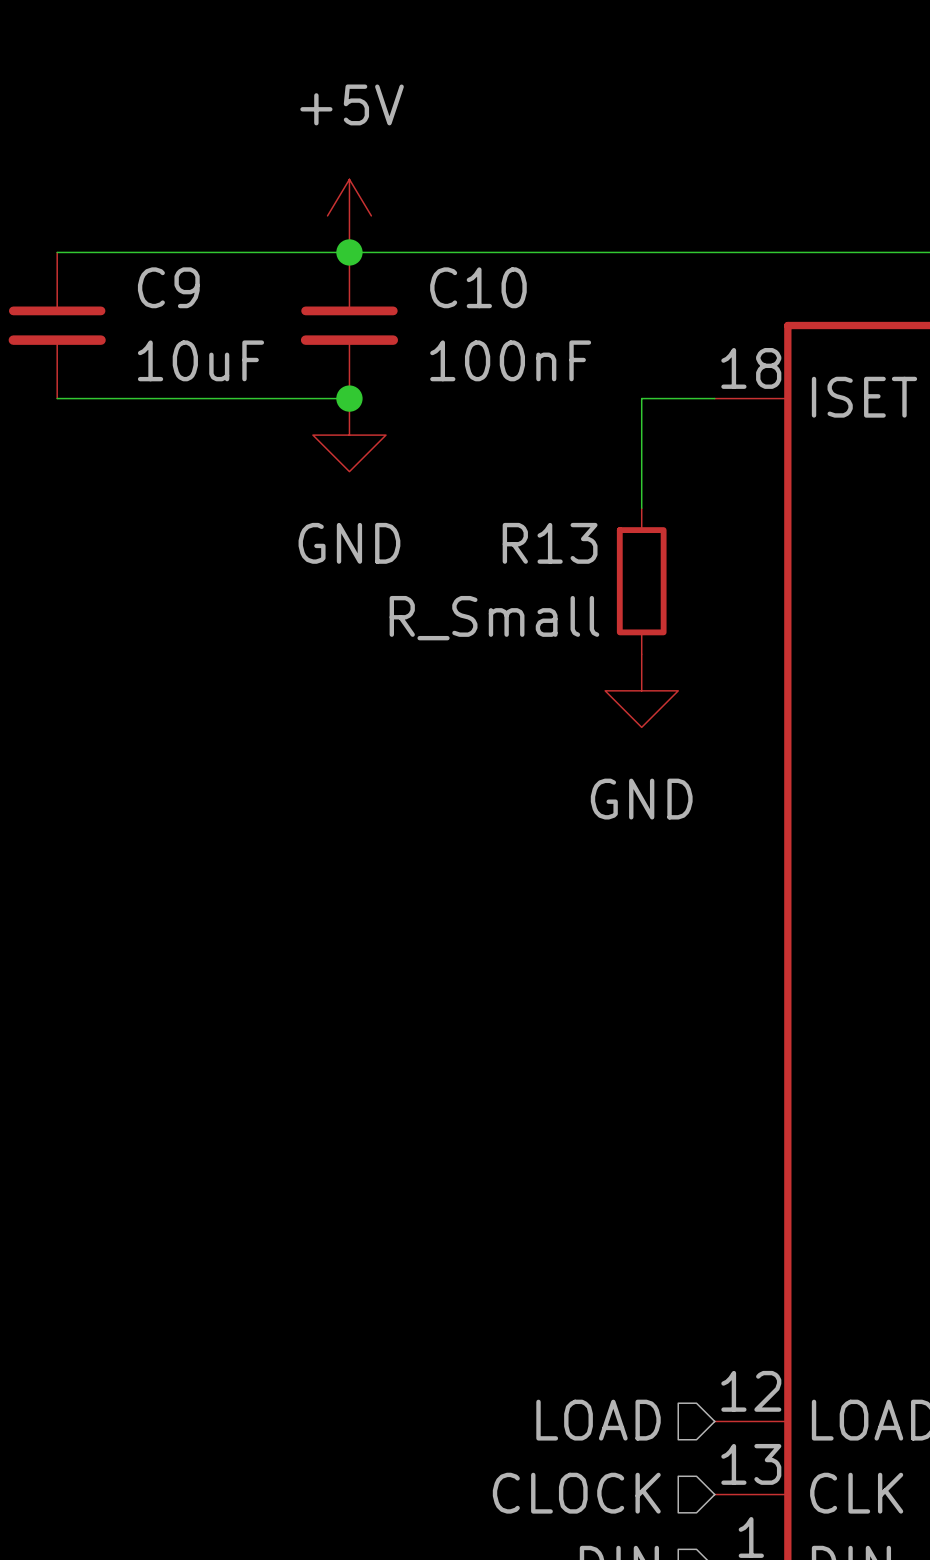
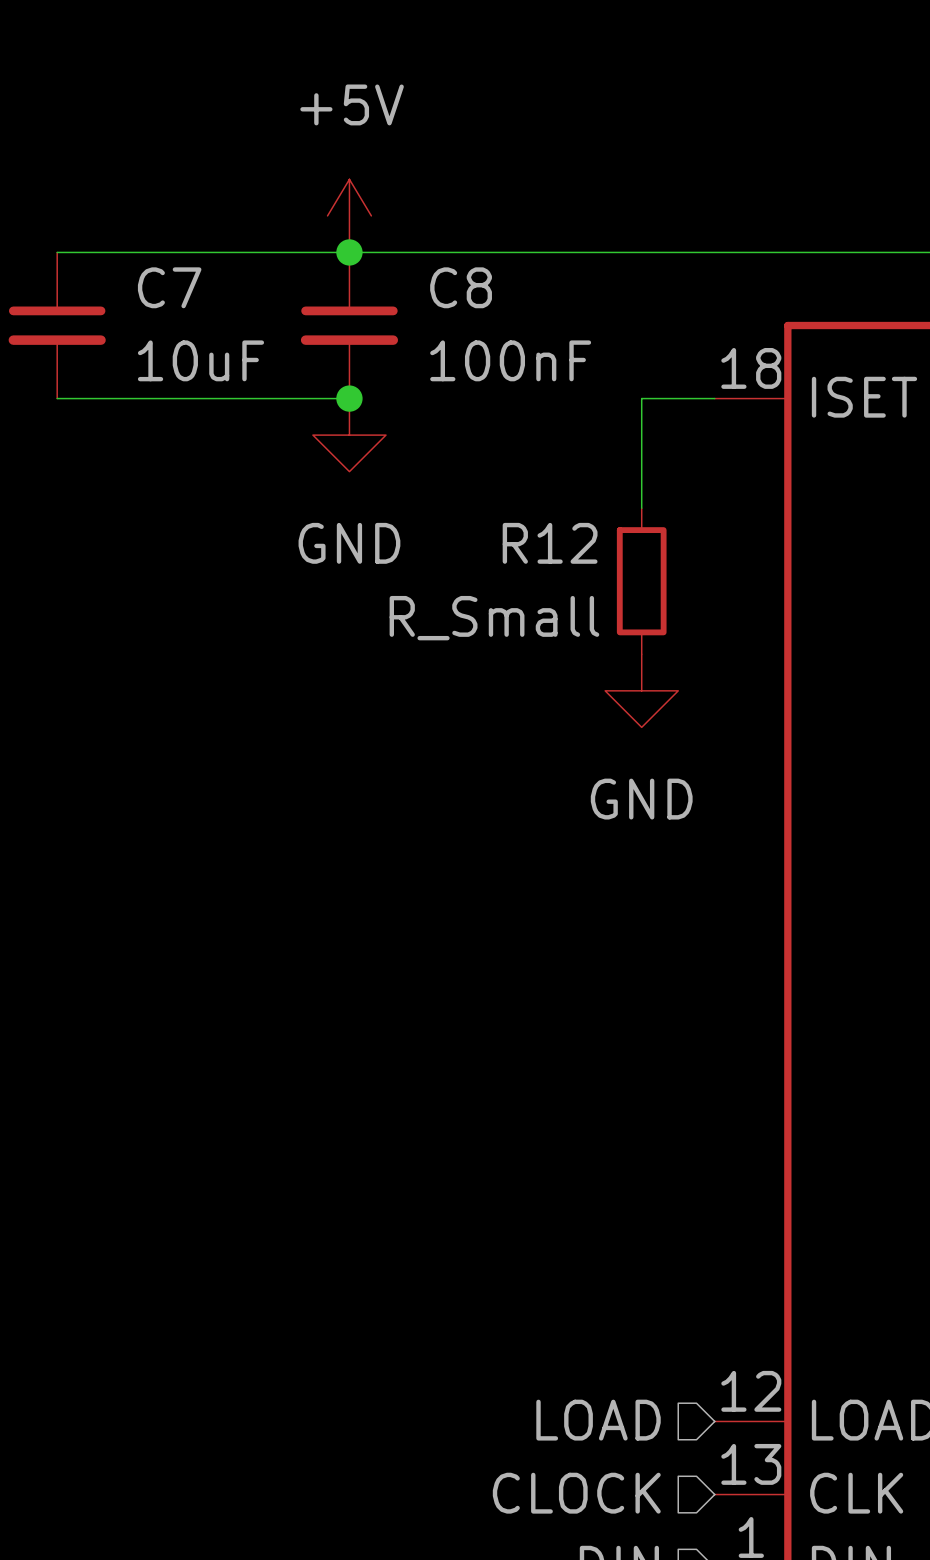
C9 name: C9 (168, 287) -> C7 (169, 287)
C10 name: C10 (478, 287) -> C8 (461, 287)
R13 name: R13 (550, 543) -> R12 (550, 543)

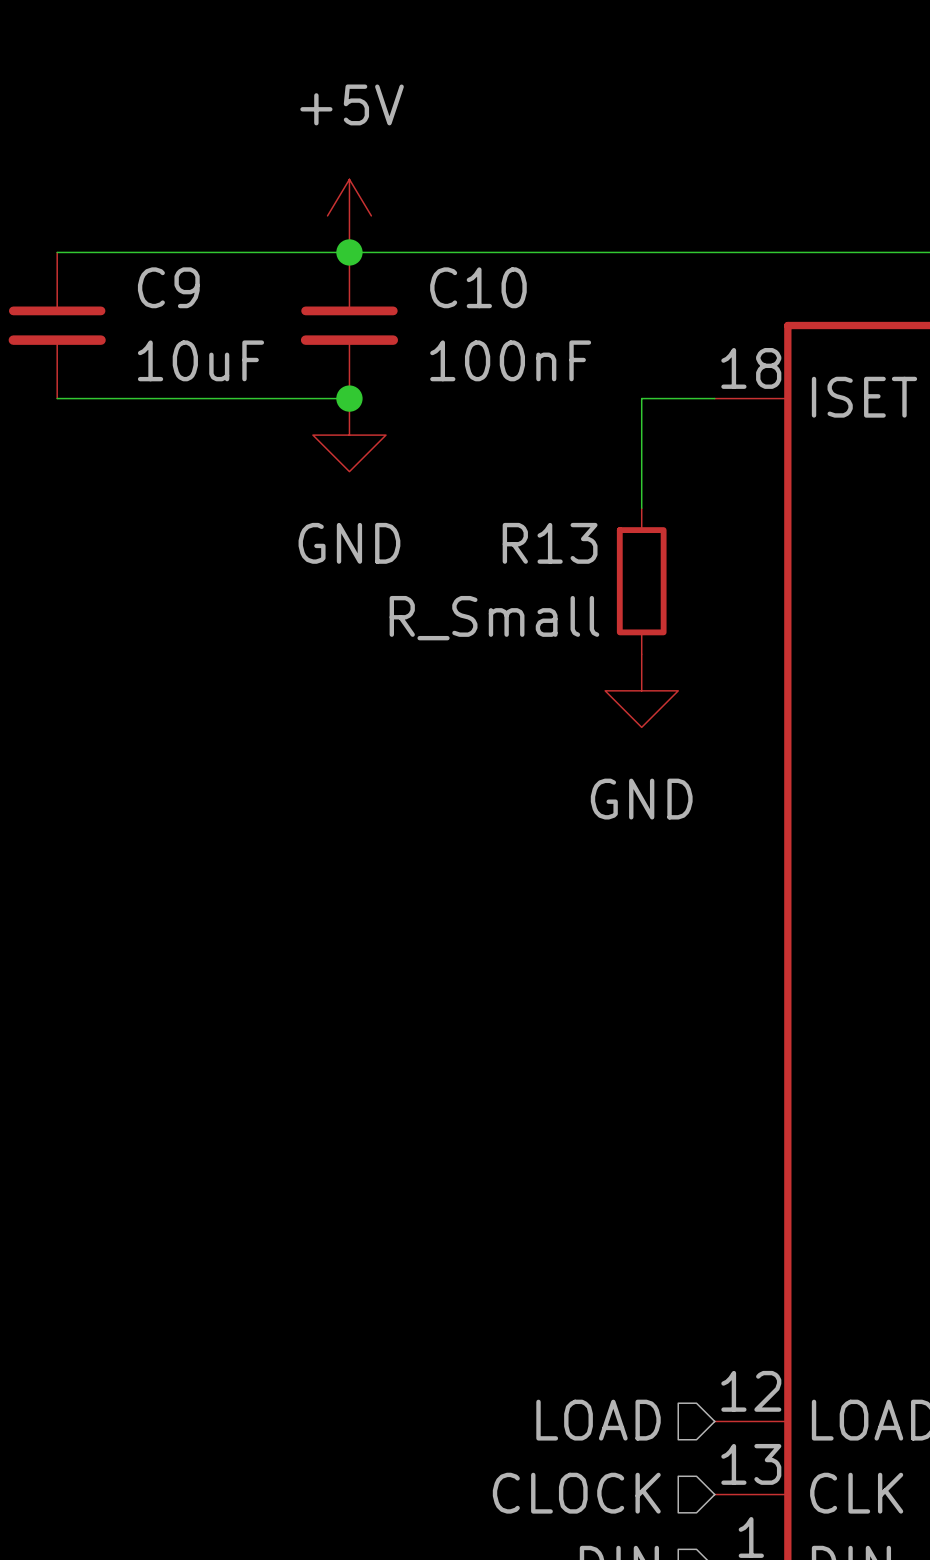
C7 name: C7 (169, 287) -> C9 (168, 287)
C8 name: C8 (461, 287) -> C10 (478, 287)
R12 name: R12 (550, 543) -> R13 (550, 543)

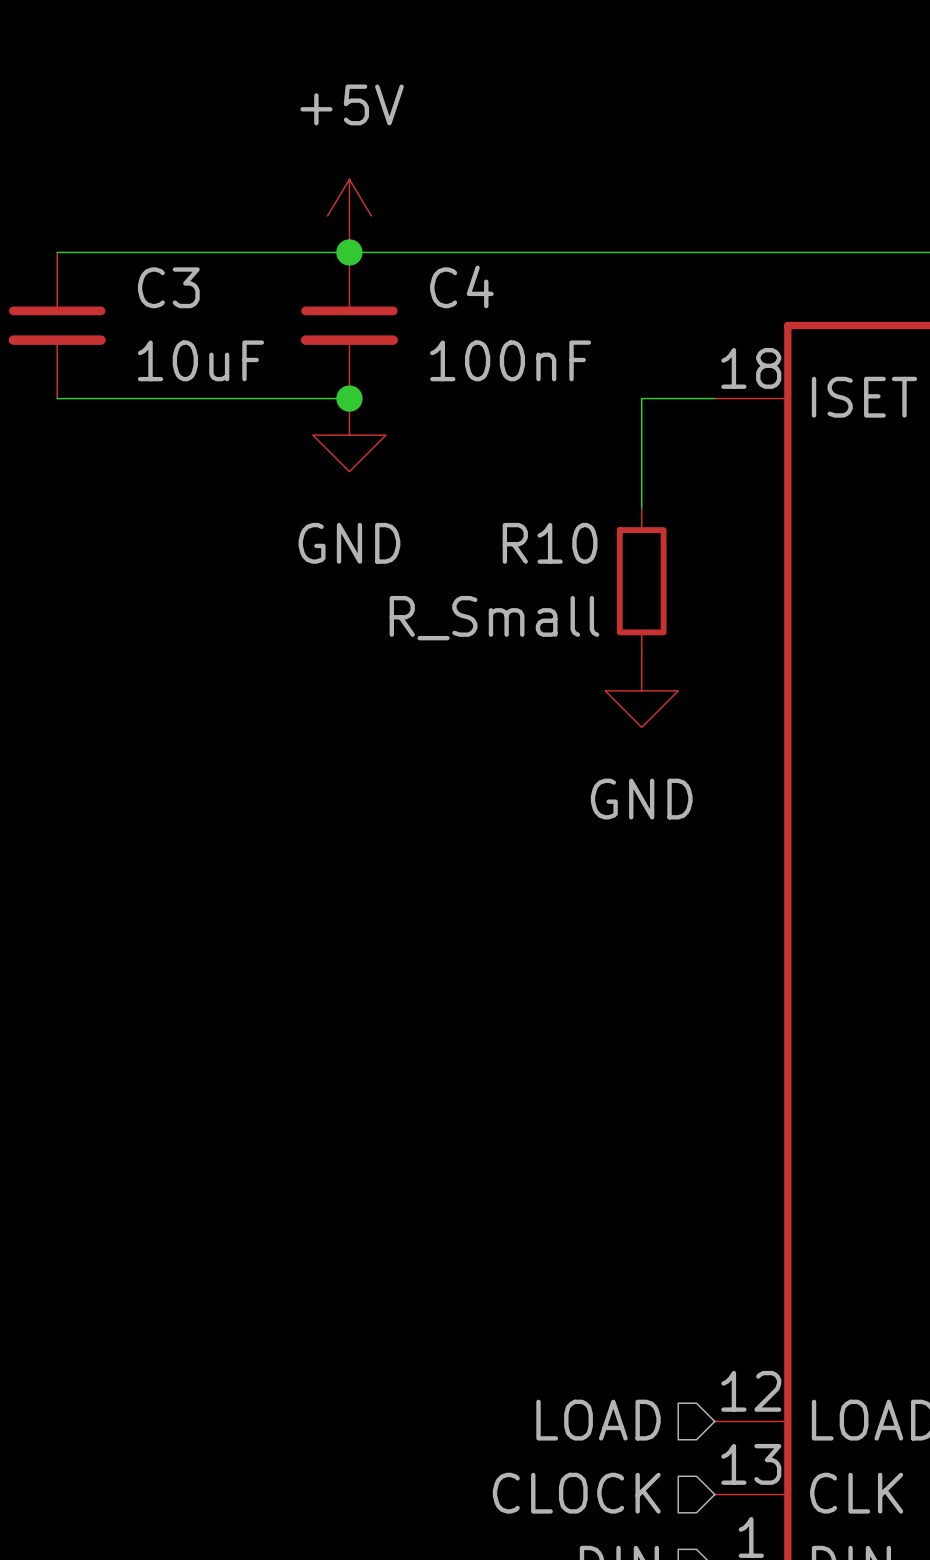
C9 name: C9 (168, 287) -> C3 (168, 287)
C10 name: C10 (478, 287) -> C4 (461, 286)
R13 name: R13 (550, 543) -> R10 (550, 543)

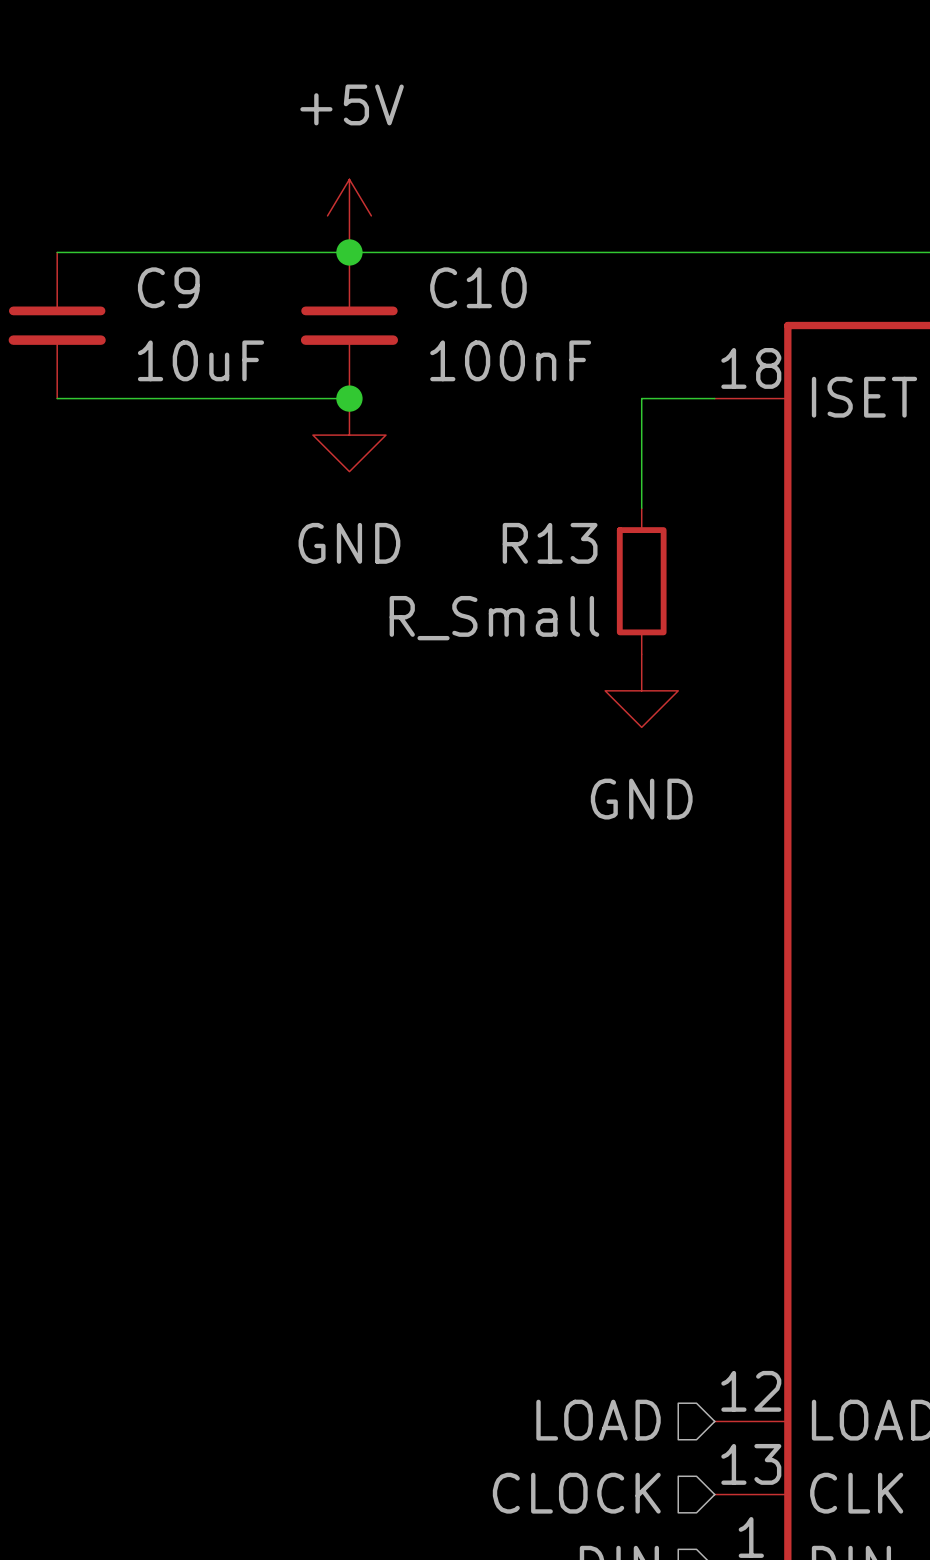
C4 name: C4 (461, 286) -> C10 (478, 287)
C3 name: C3 (168, 287) -> C9 (168, 287)
R10 name: R10 (550, 543) -> R13 (550, 543)

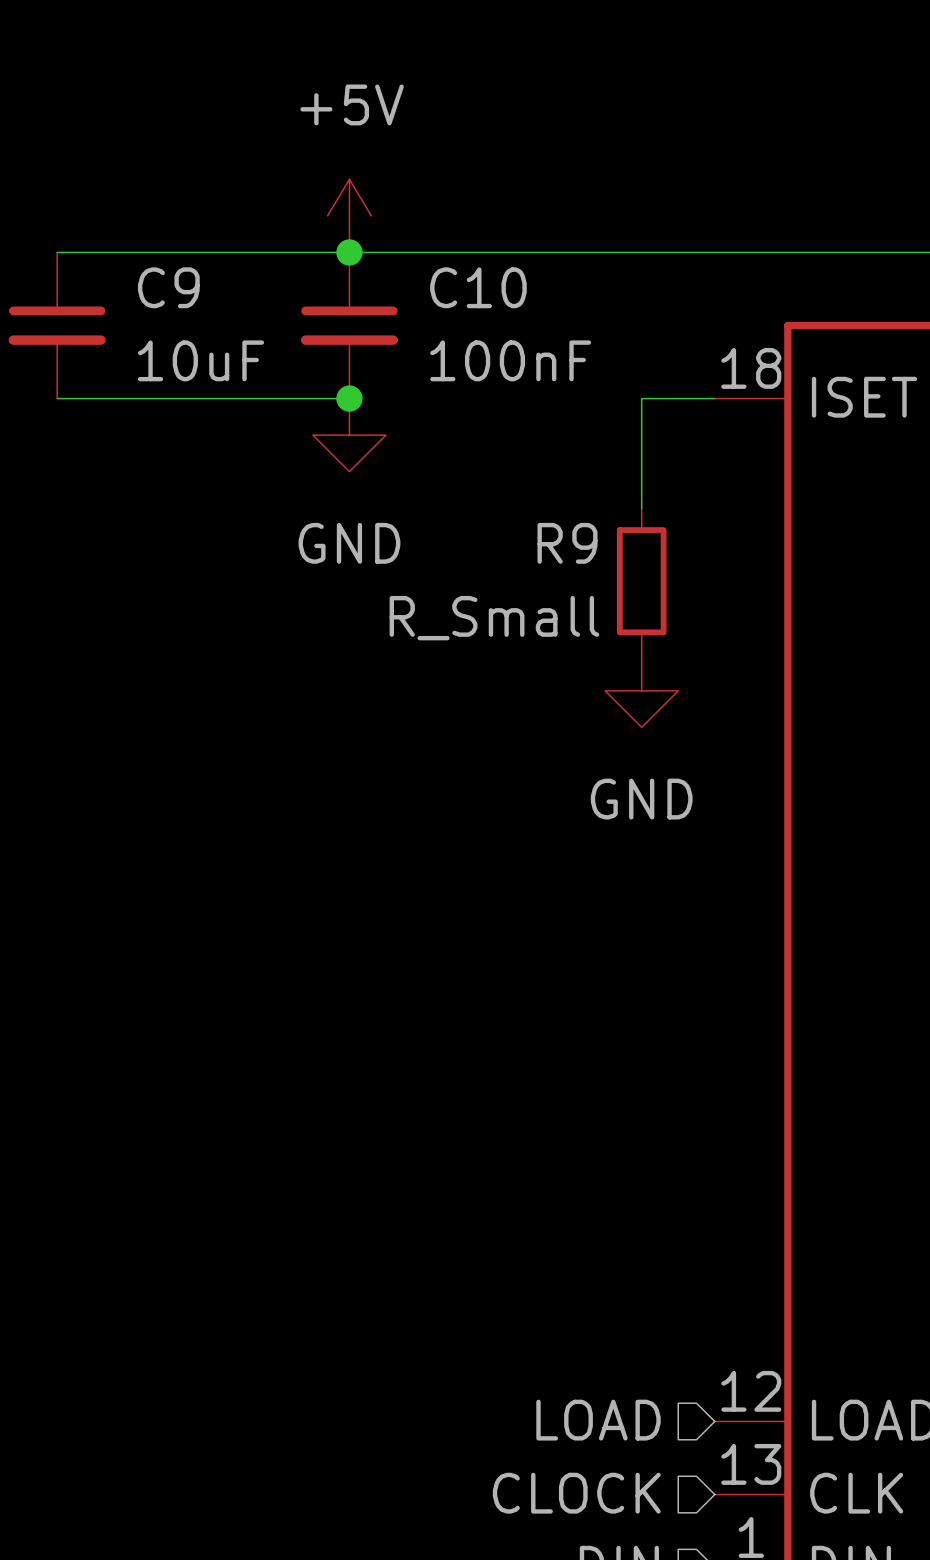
R13 name: R13 (550, 543) -> R9 (567, 543)

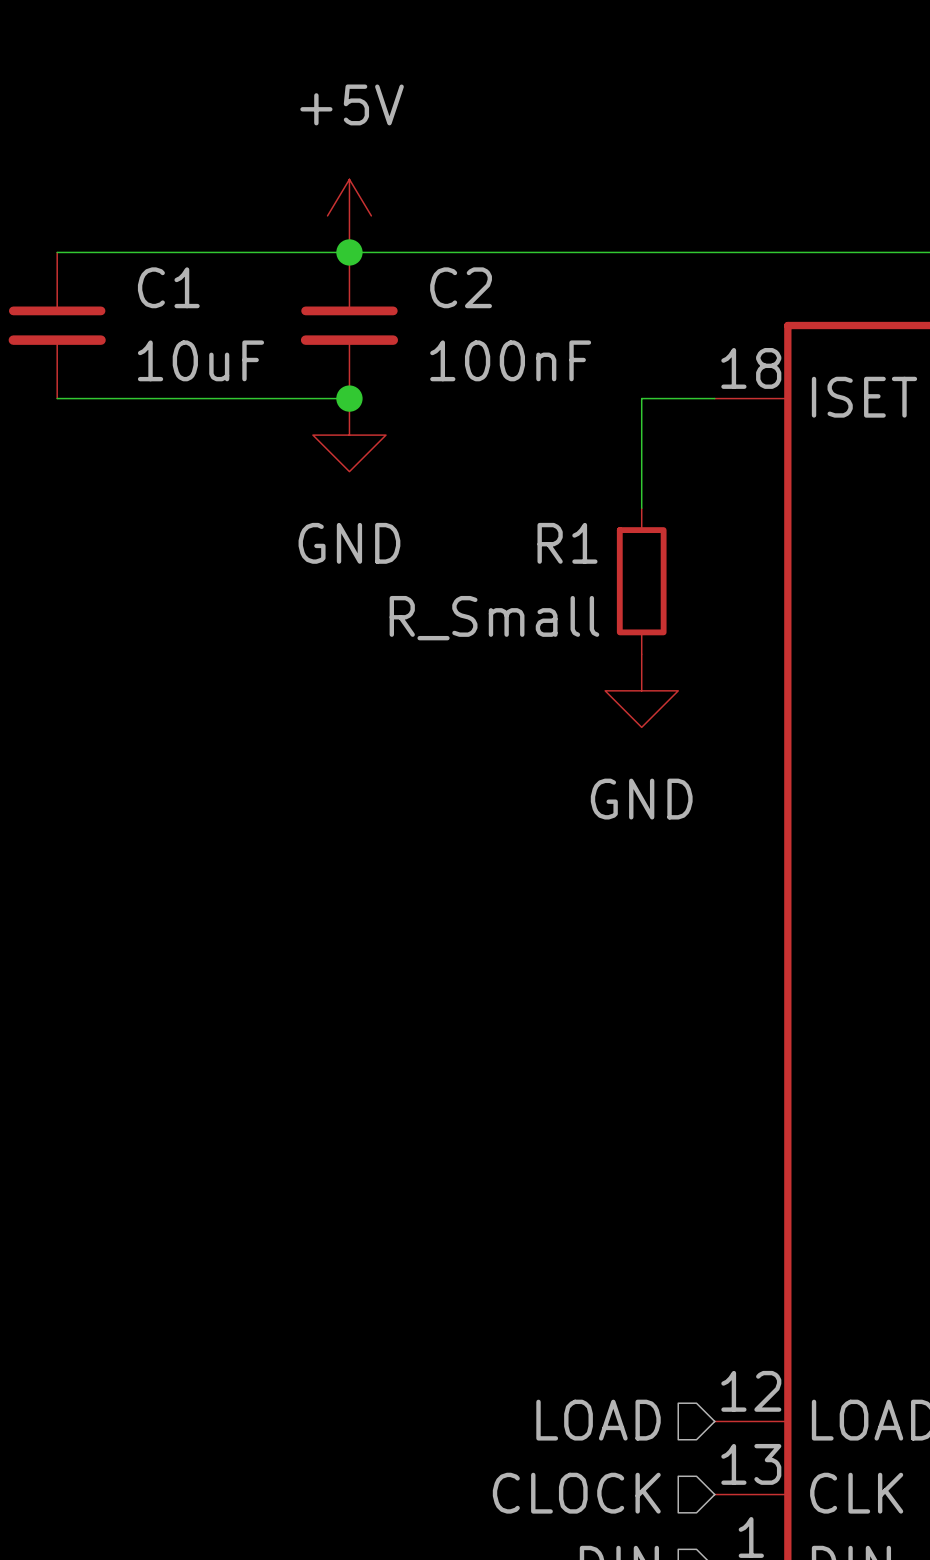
C9 name: C9 (168, 287) -> C1 (168, 287)
C10 name: C10 (478, 287) -> C2 (461, 287)
R9 name: R9 (567, 543) -> R1 (567, 543)

